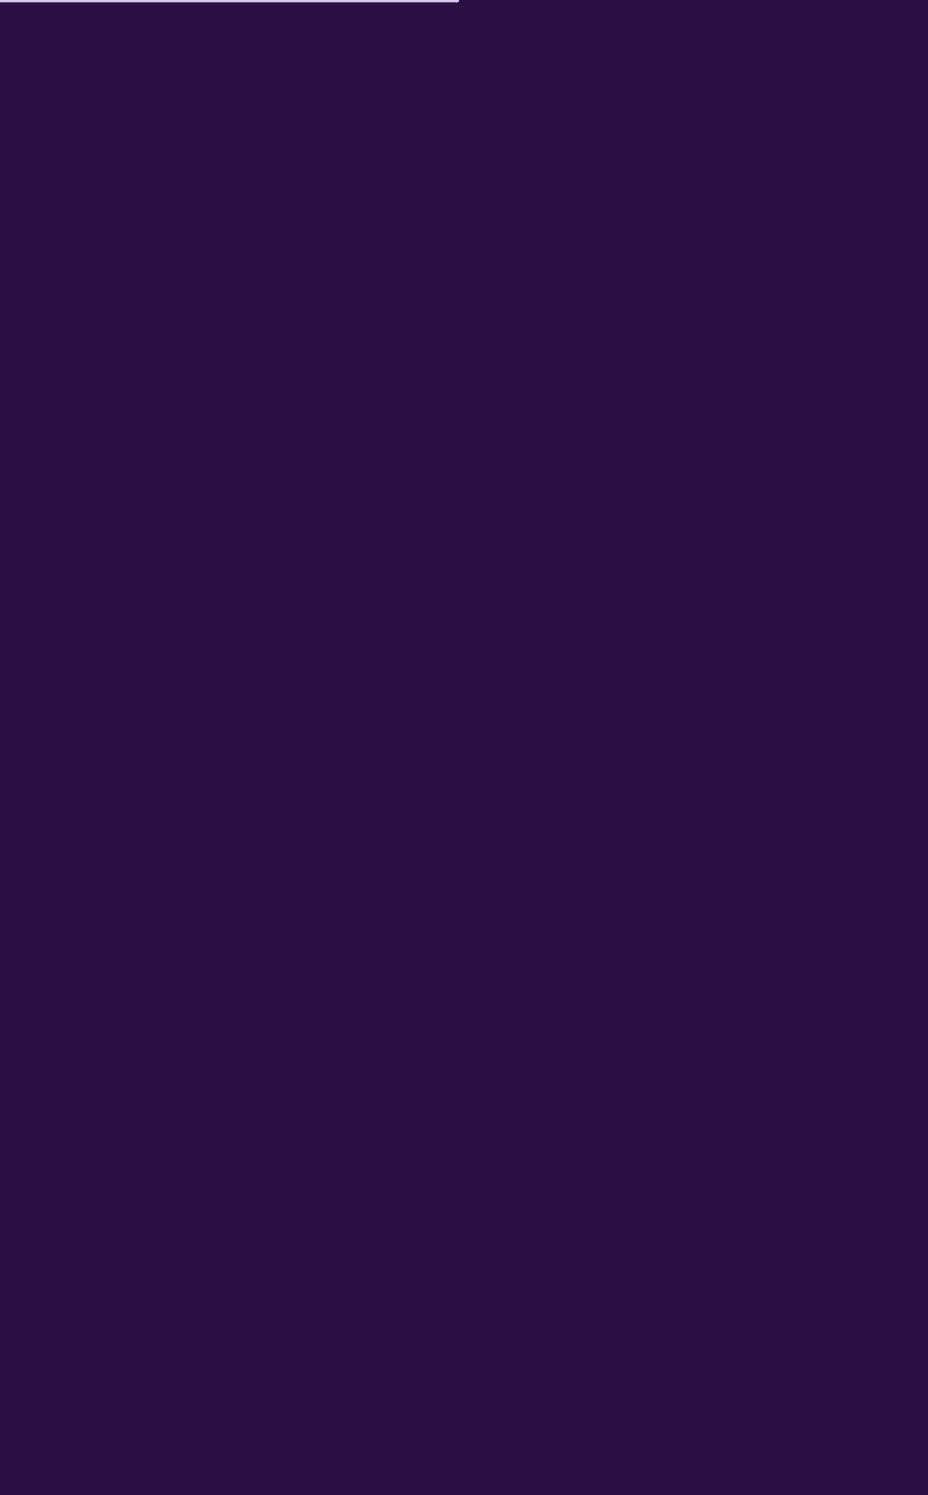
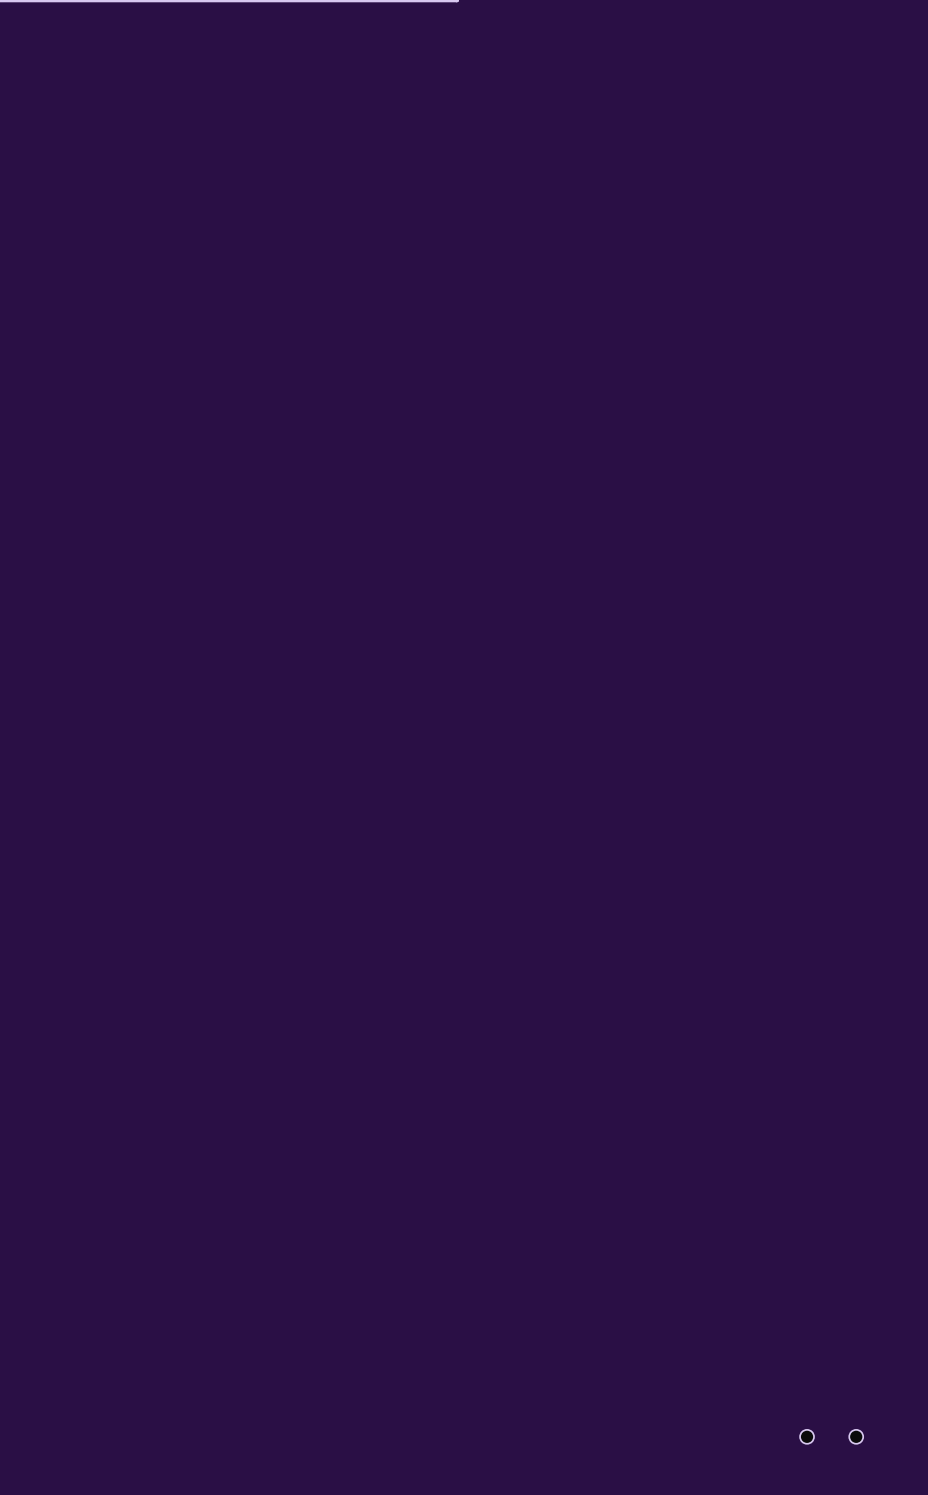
part: none -> (831, 1436)

